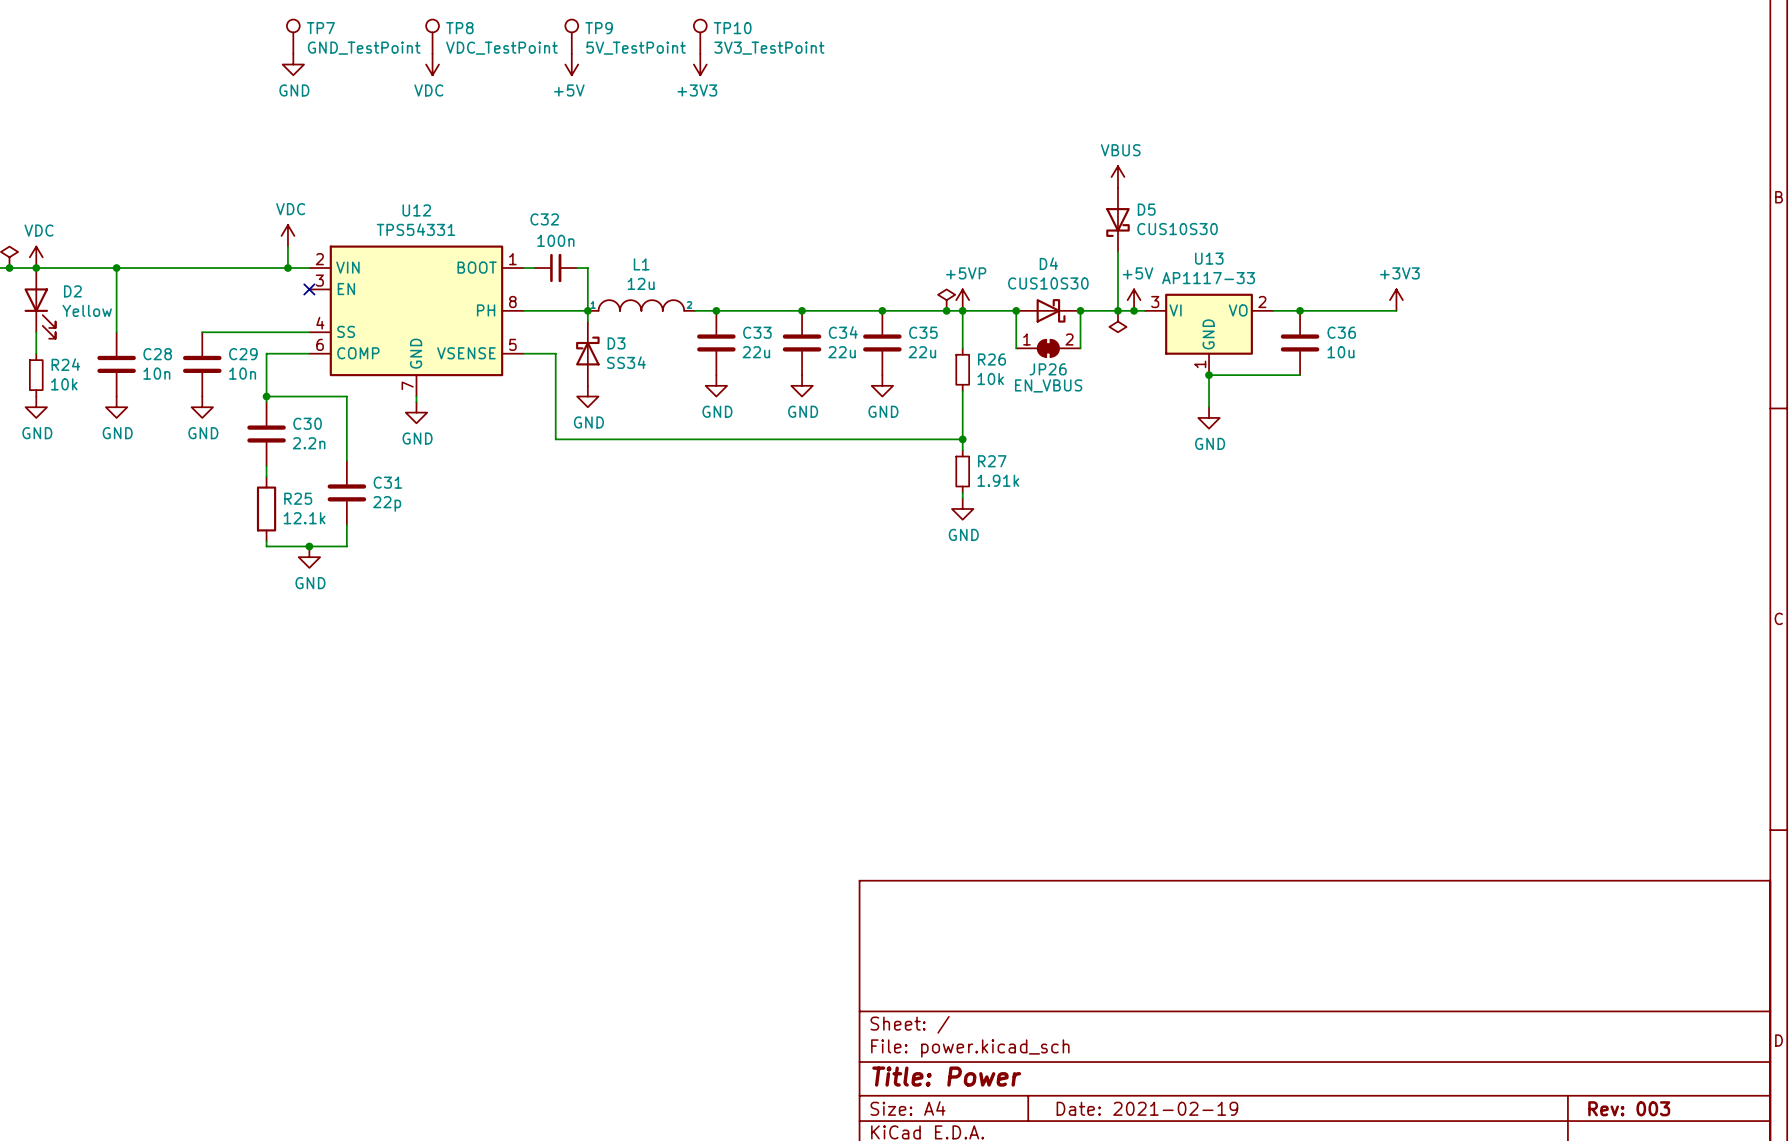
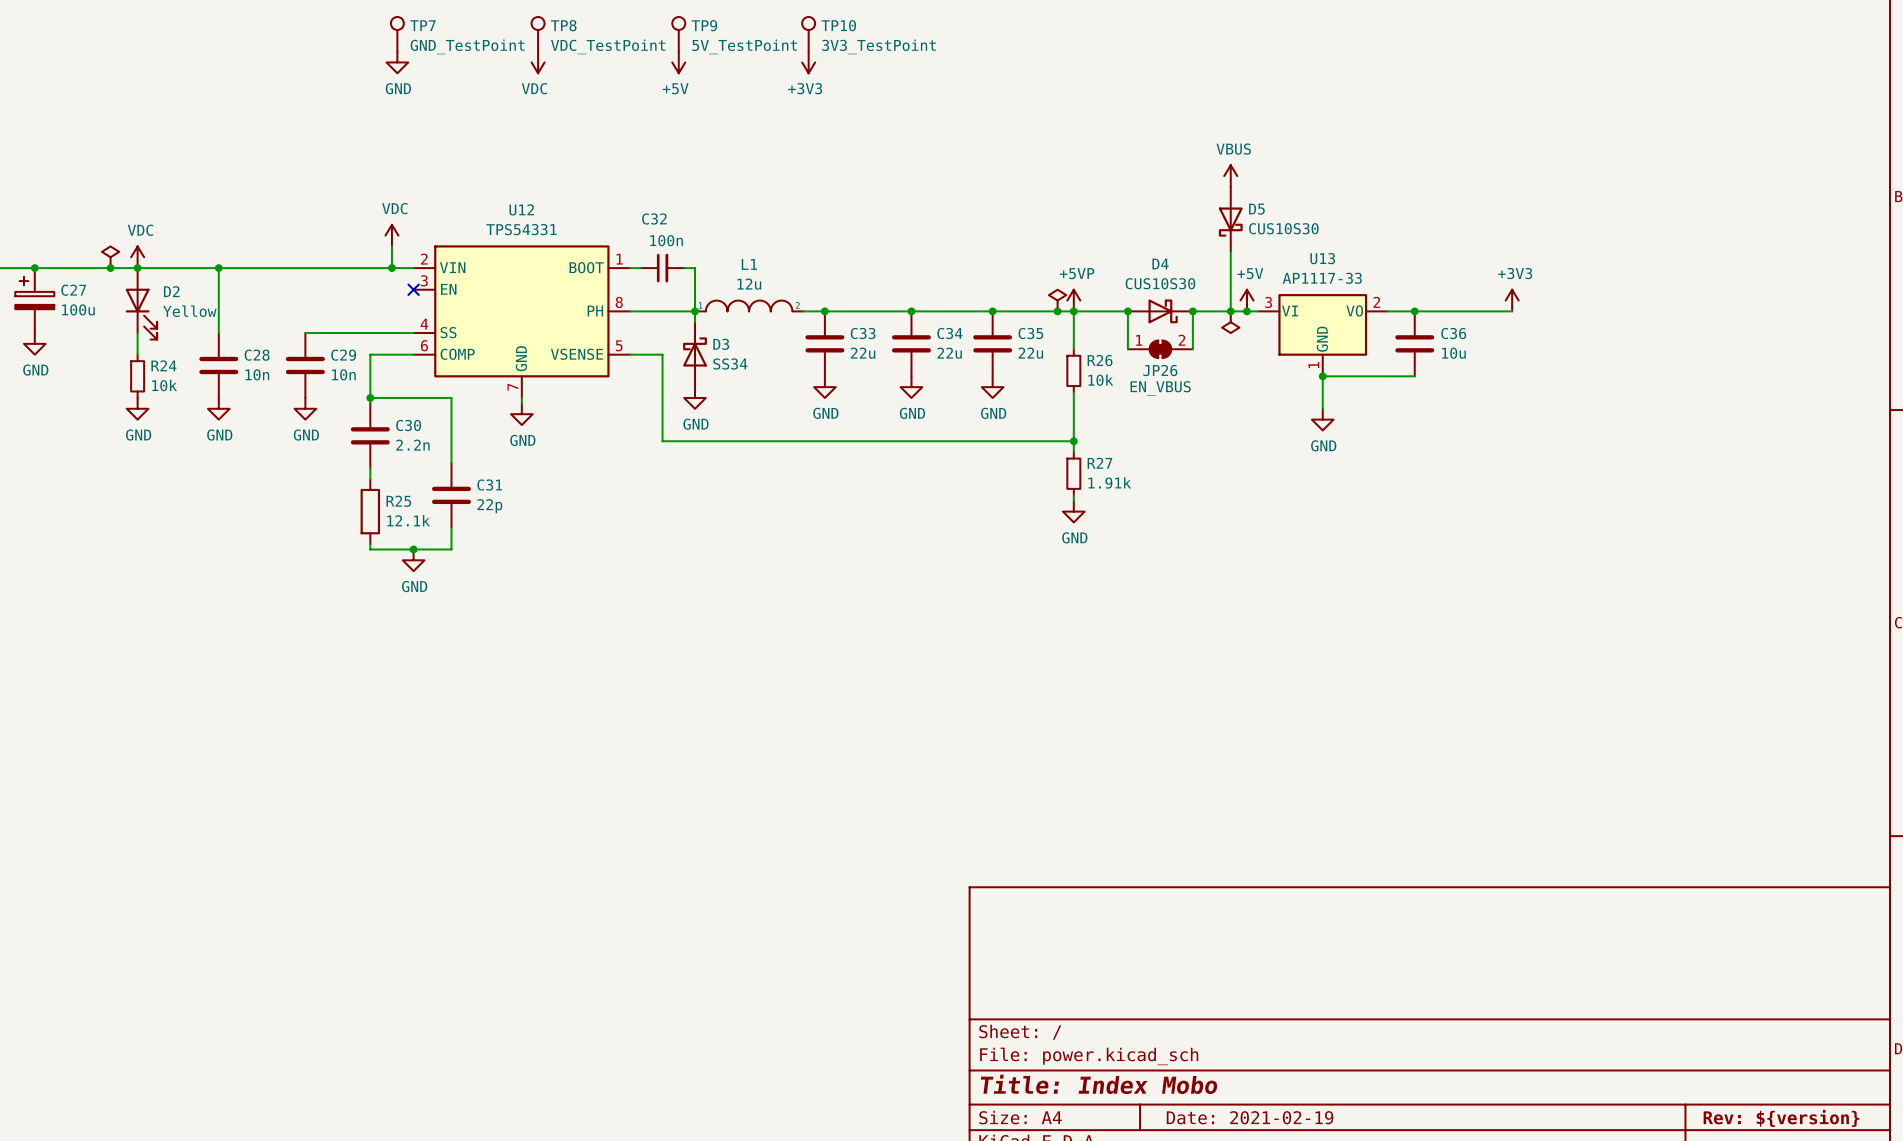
title block: Title: Power (946, 1076) -> Title: Index Mobo (1099, 1084)
title block: Rev: 003 (1629, 1108) -> Rev: ${version} (1781, 1118)

